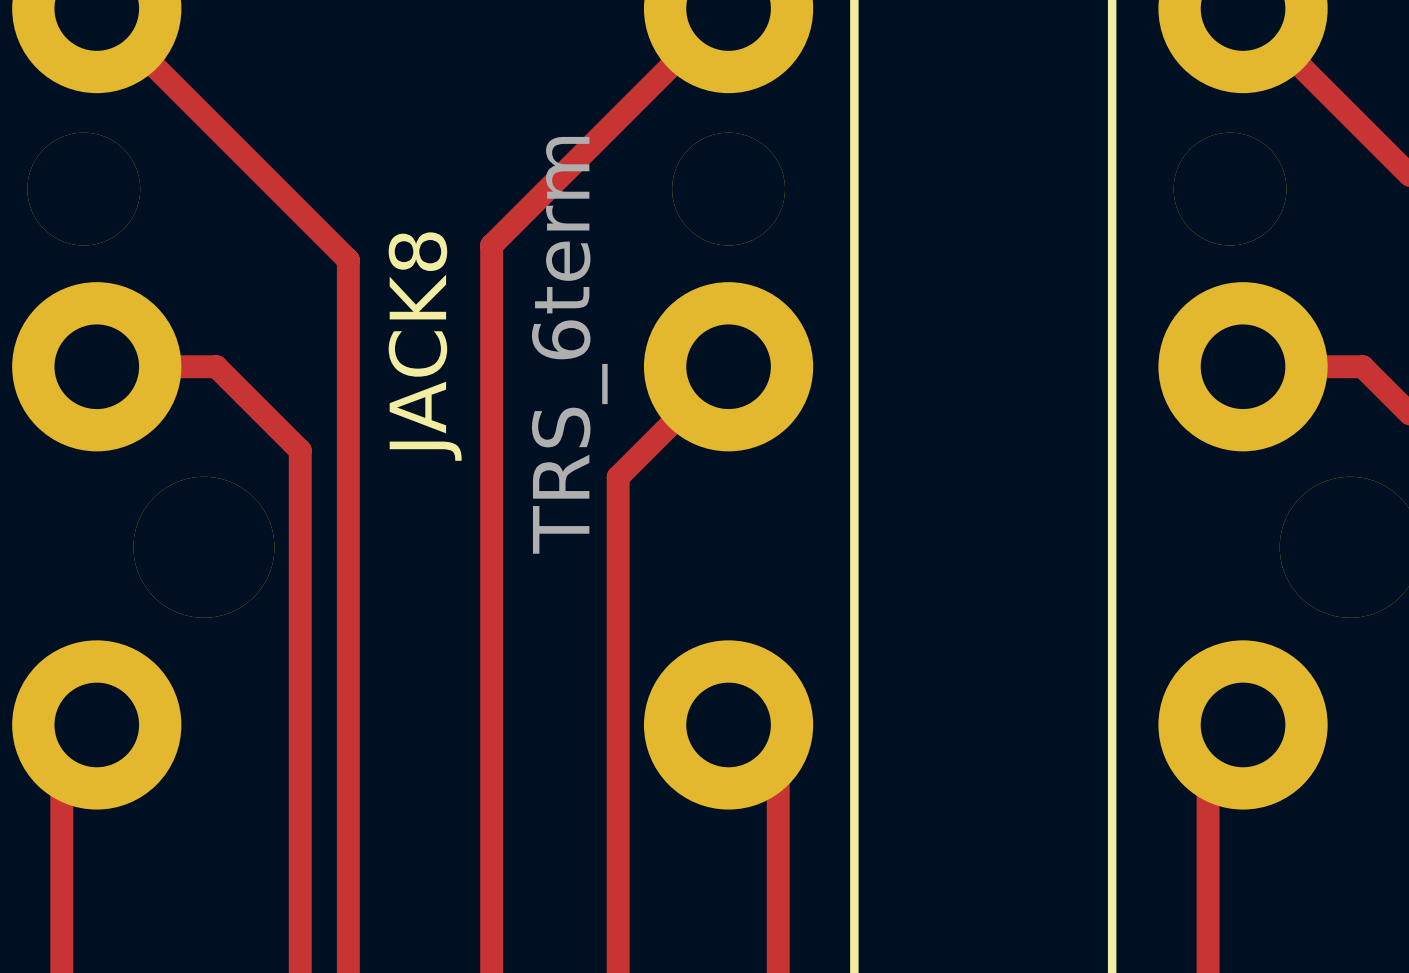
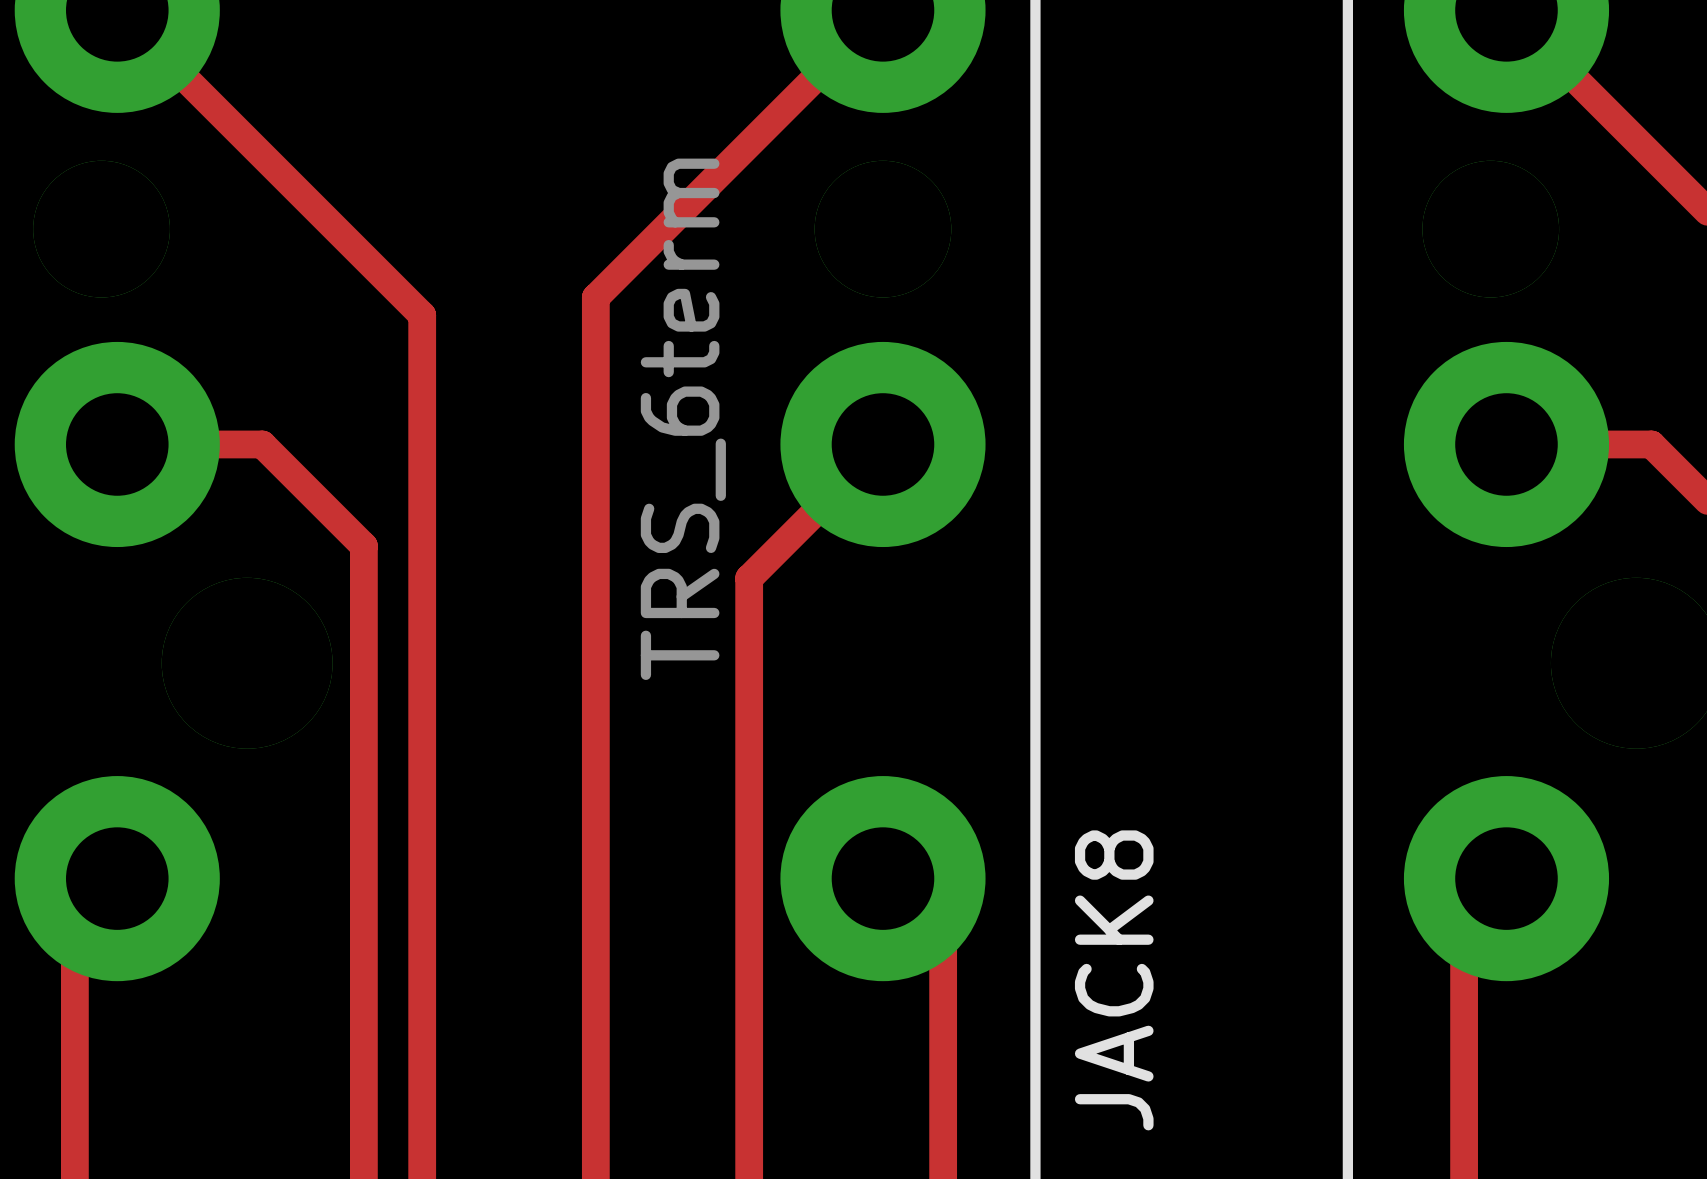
JACK8 name position: JACK8 (425, 346) -> JACK8 (1114, 980)

